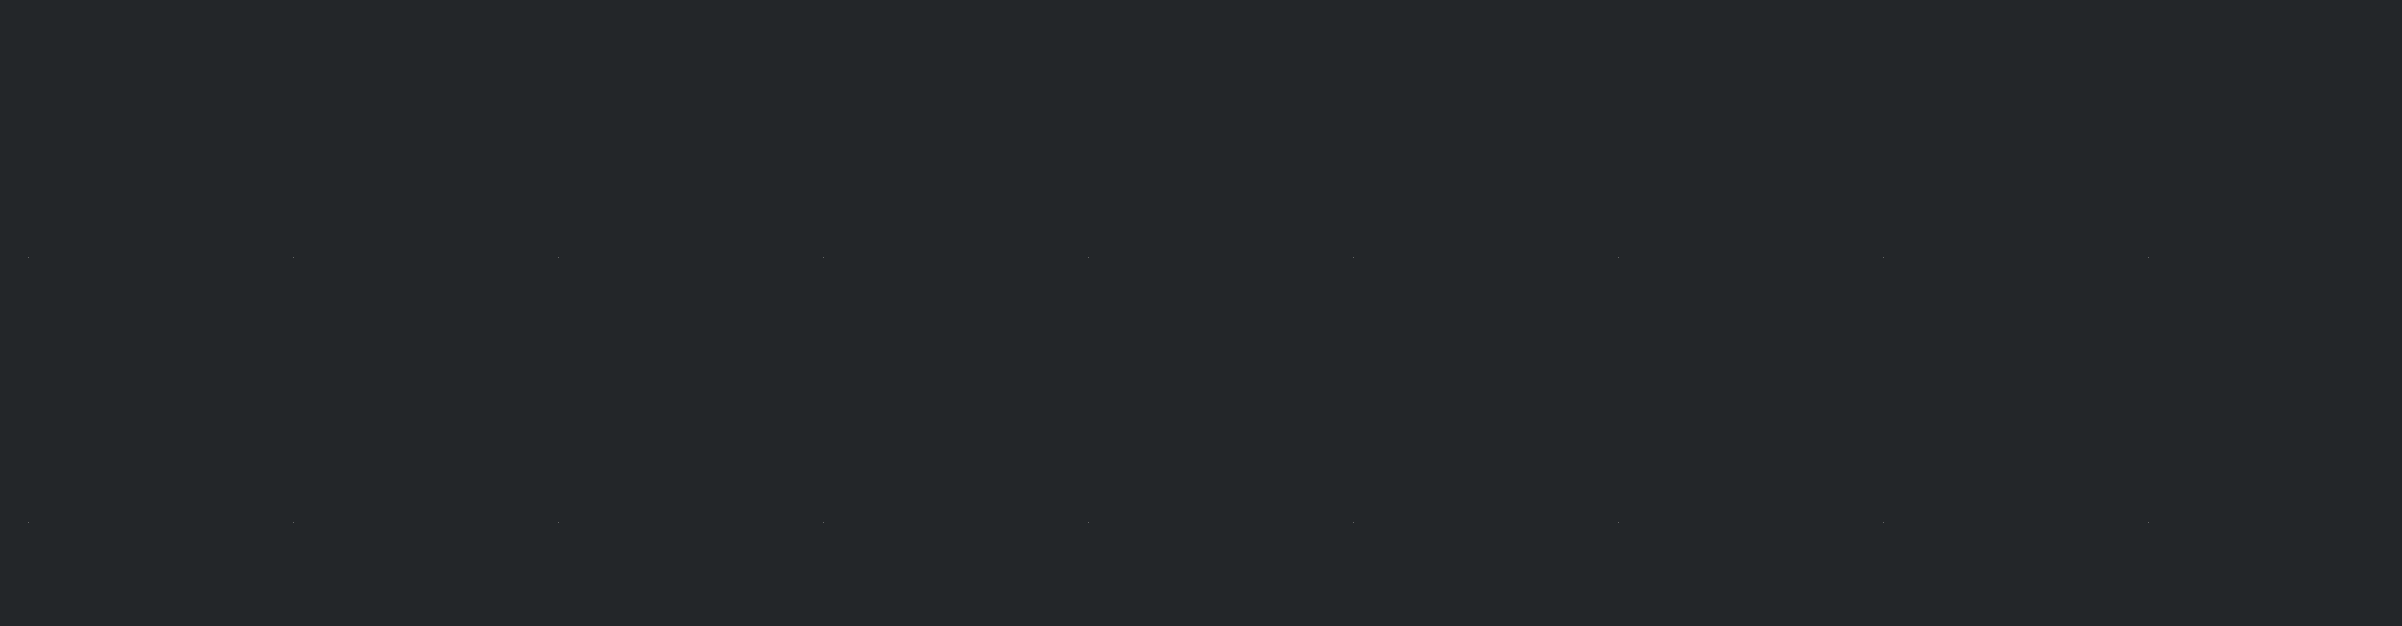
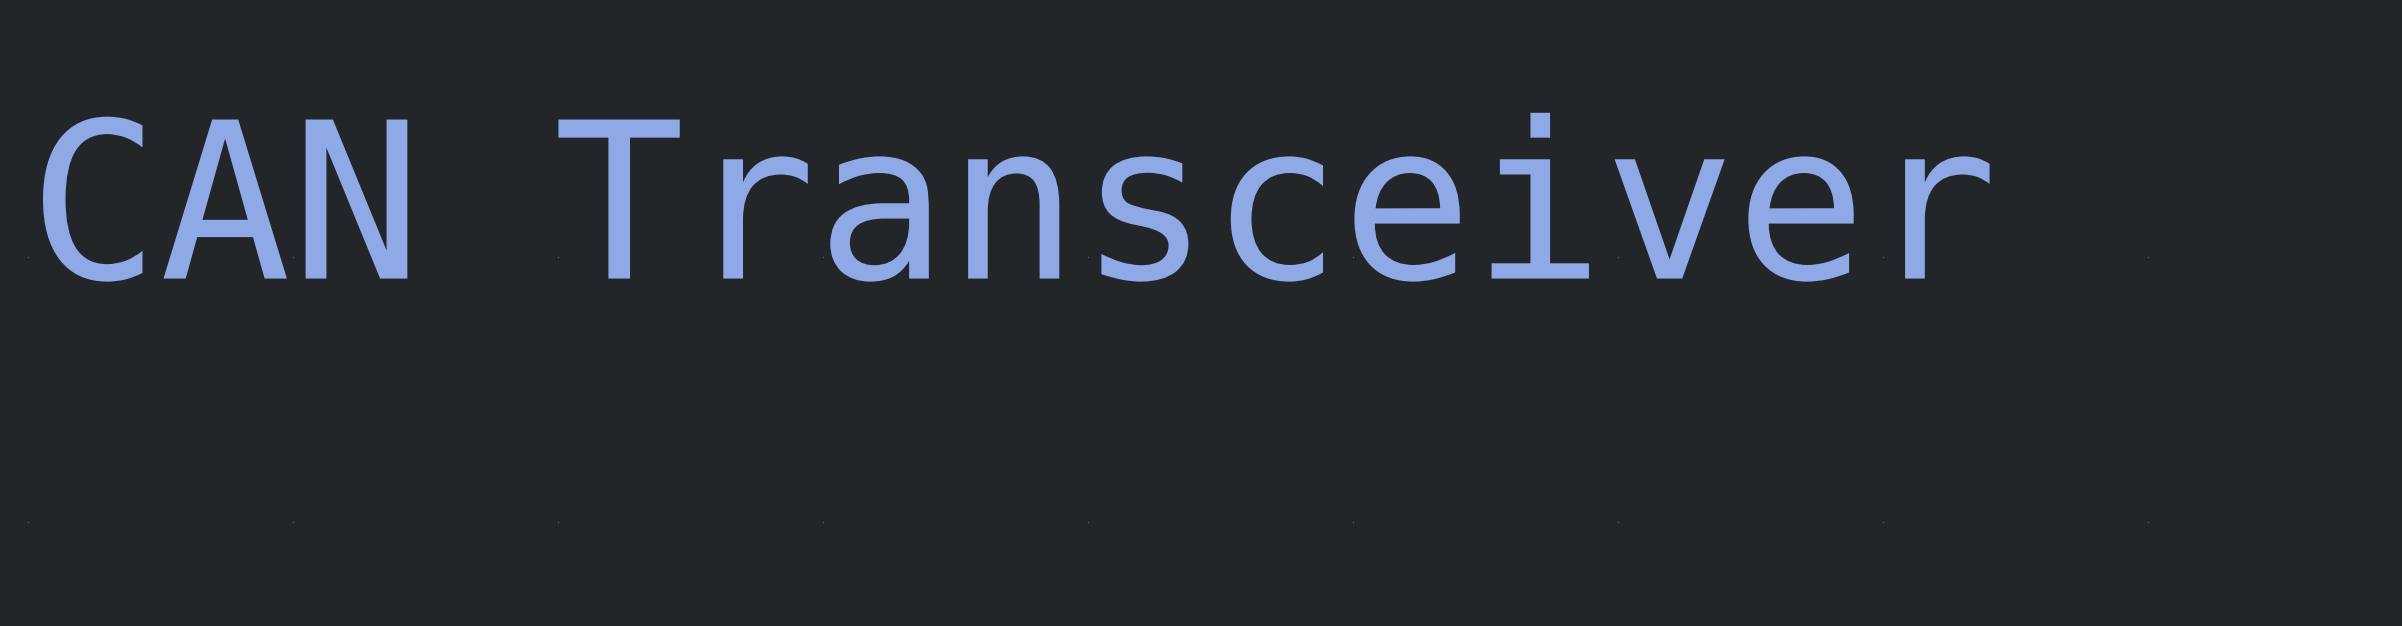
text: none -> CAN Transceiver (1016, 197)

